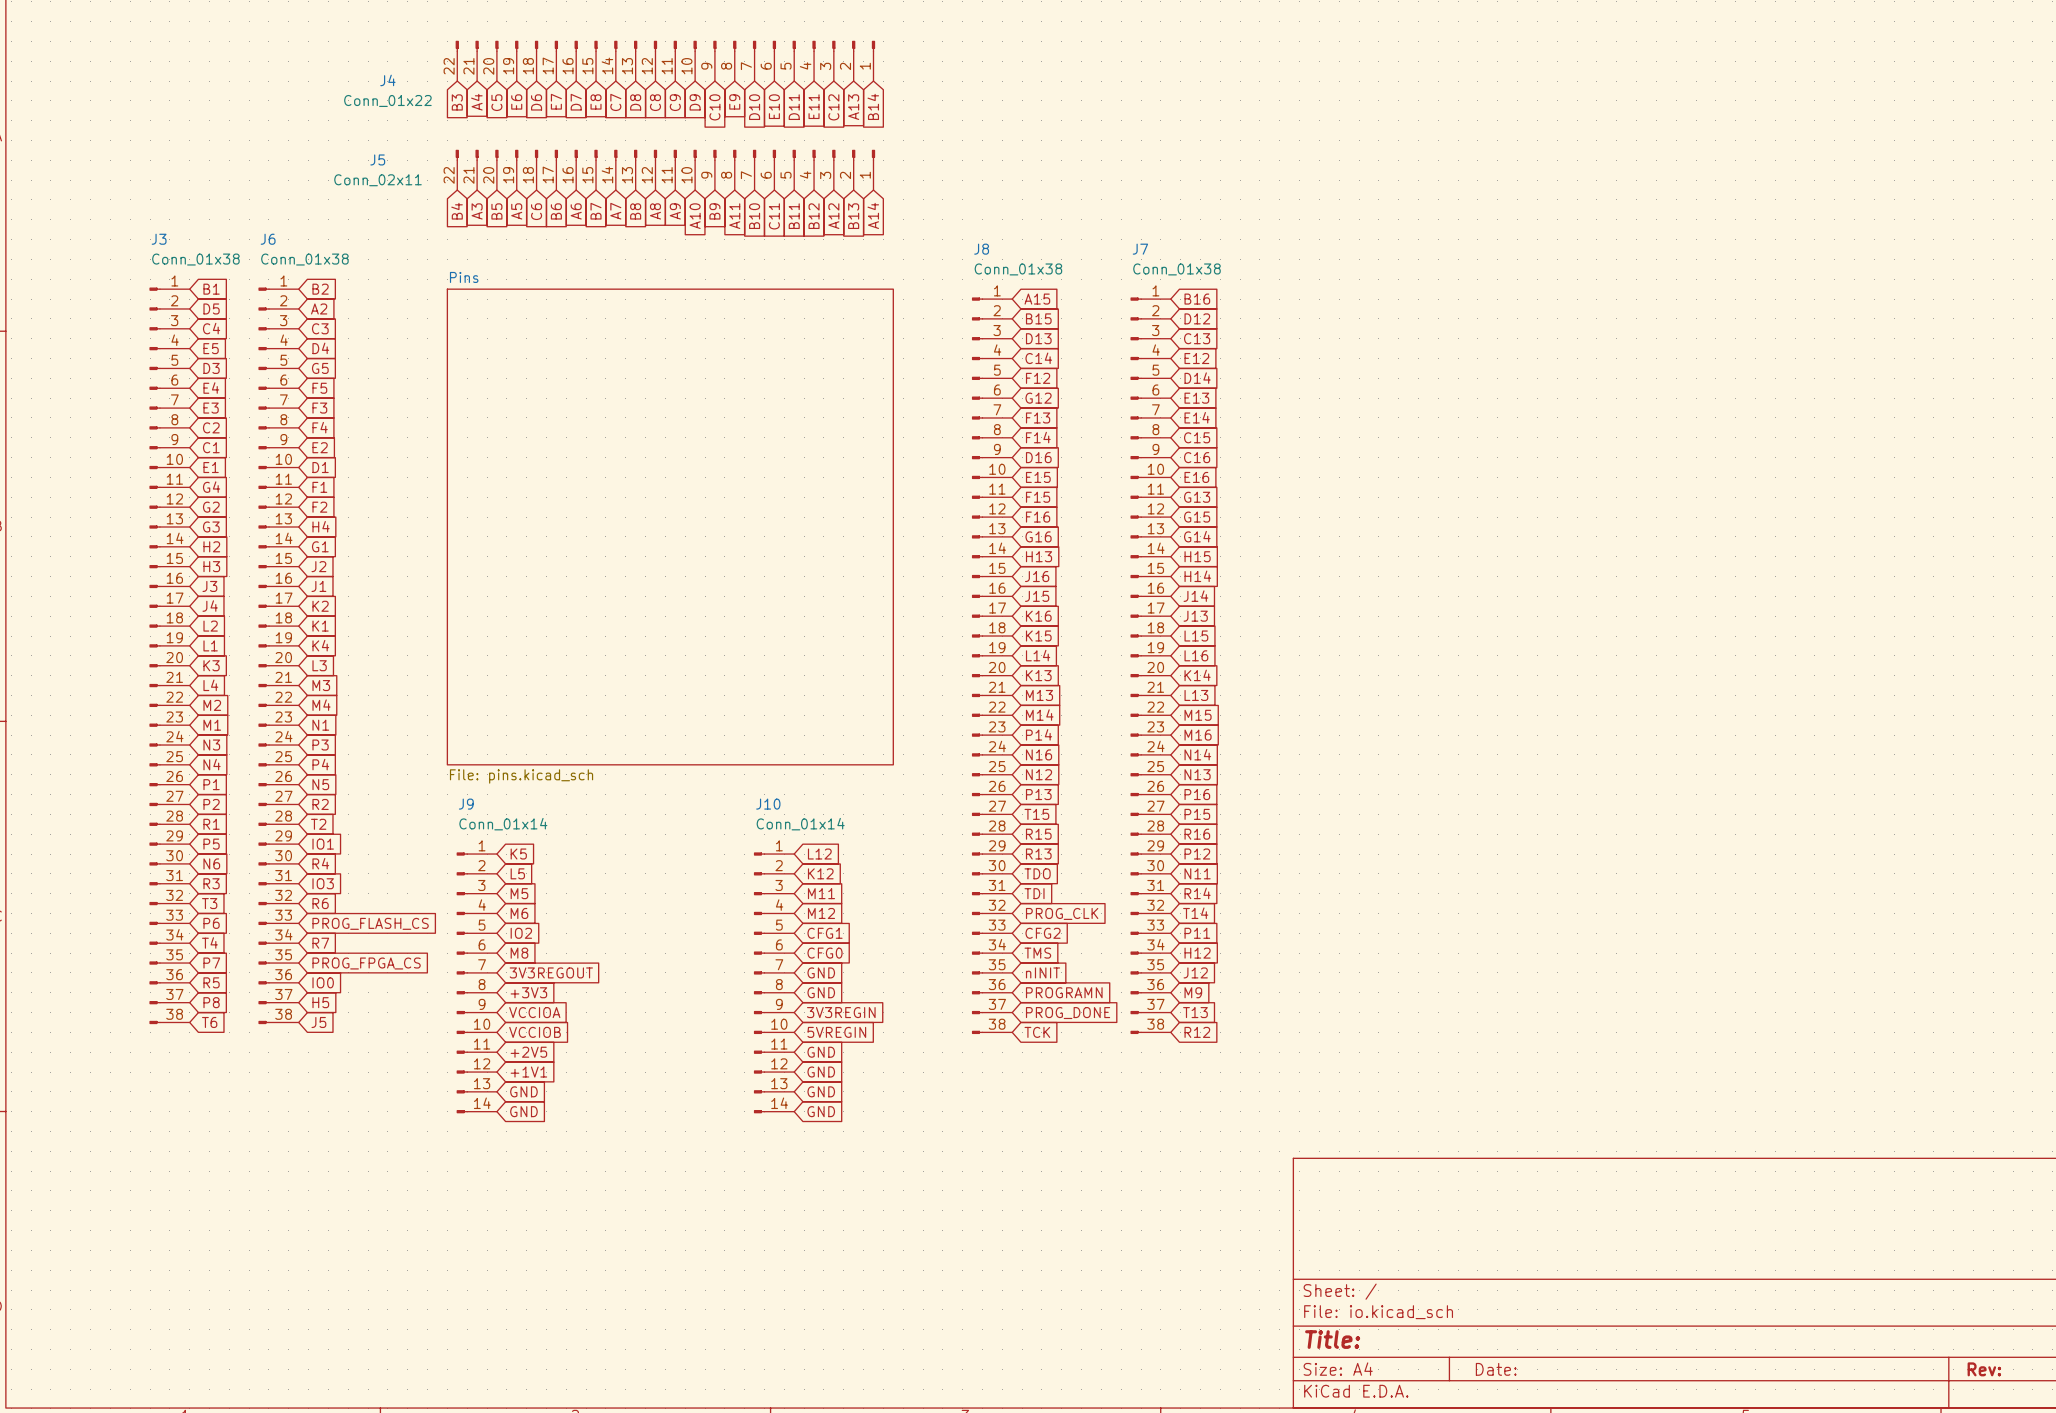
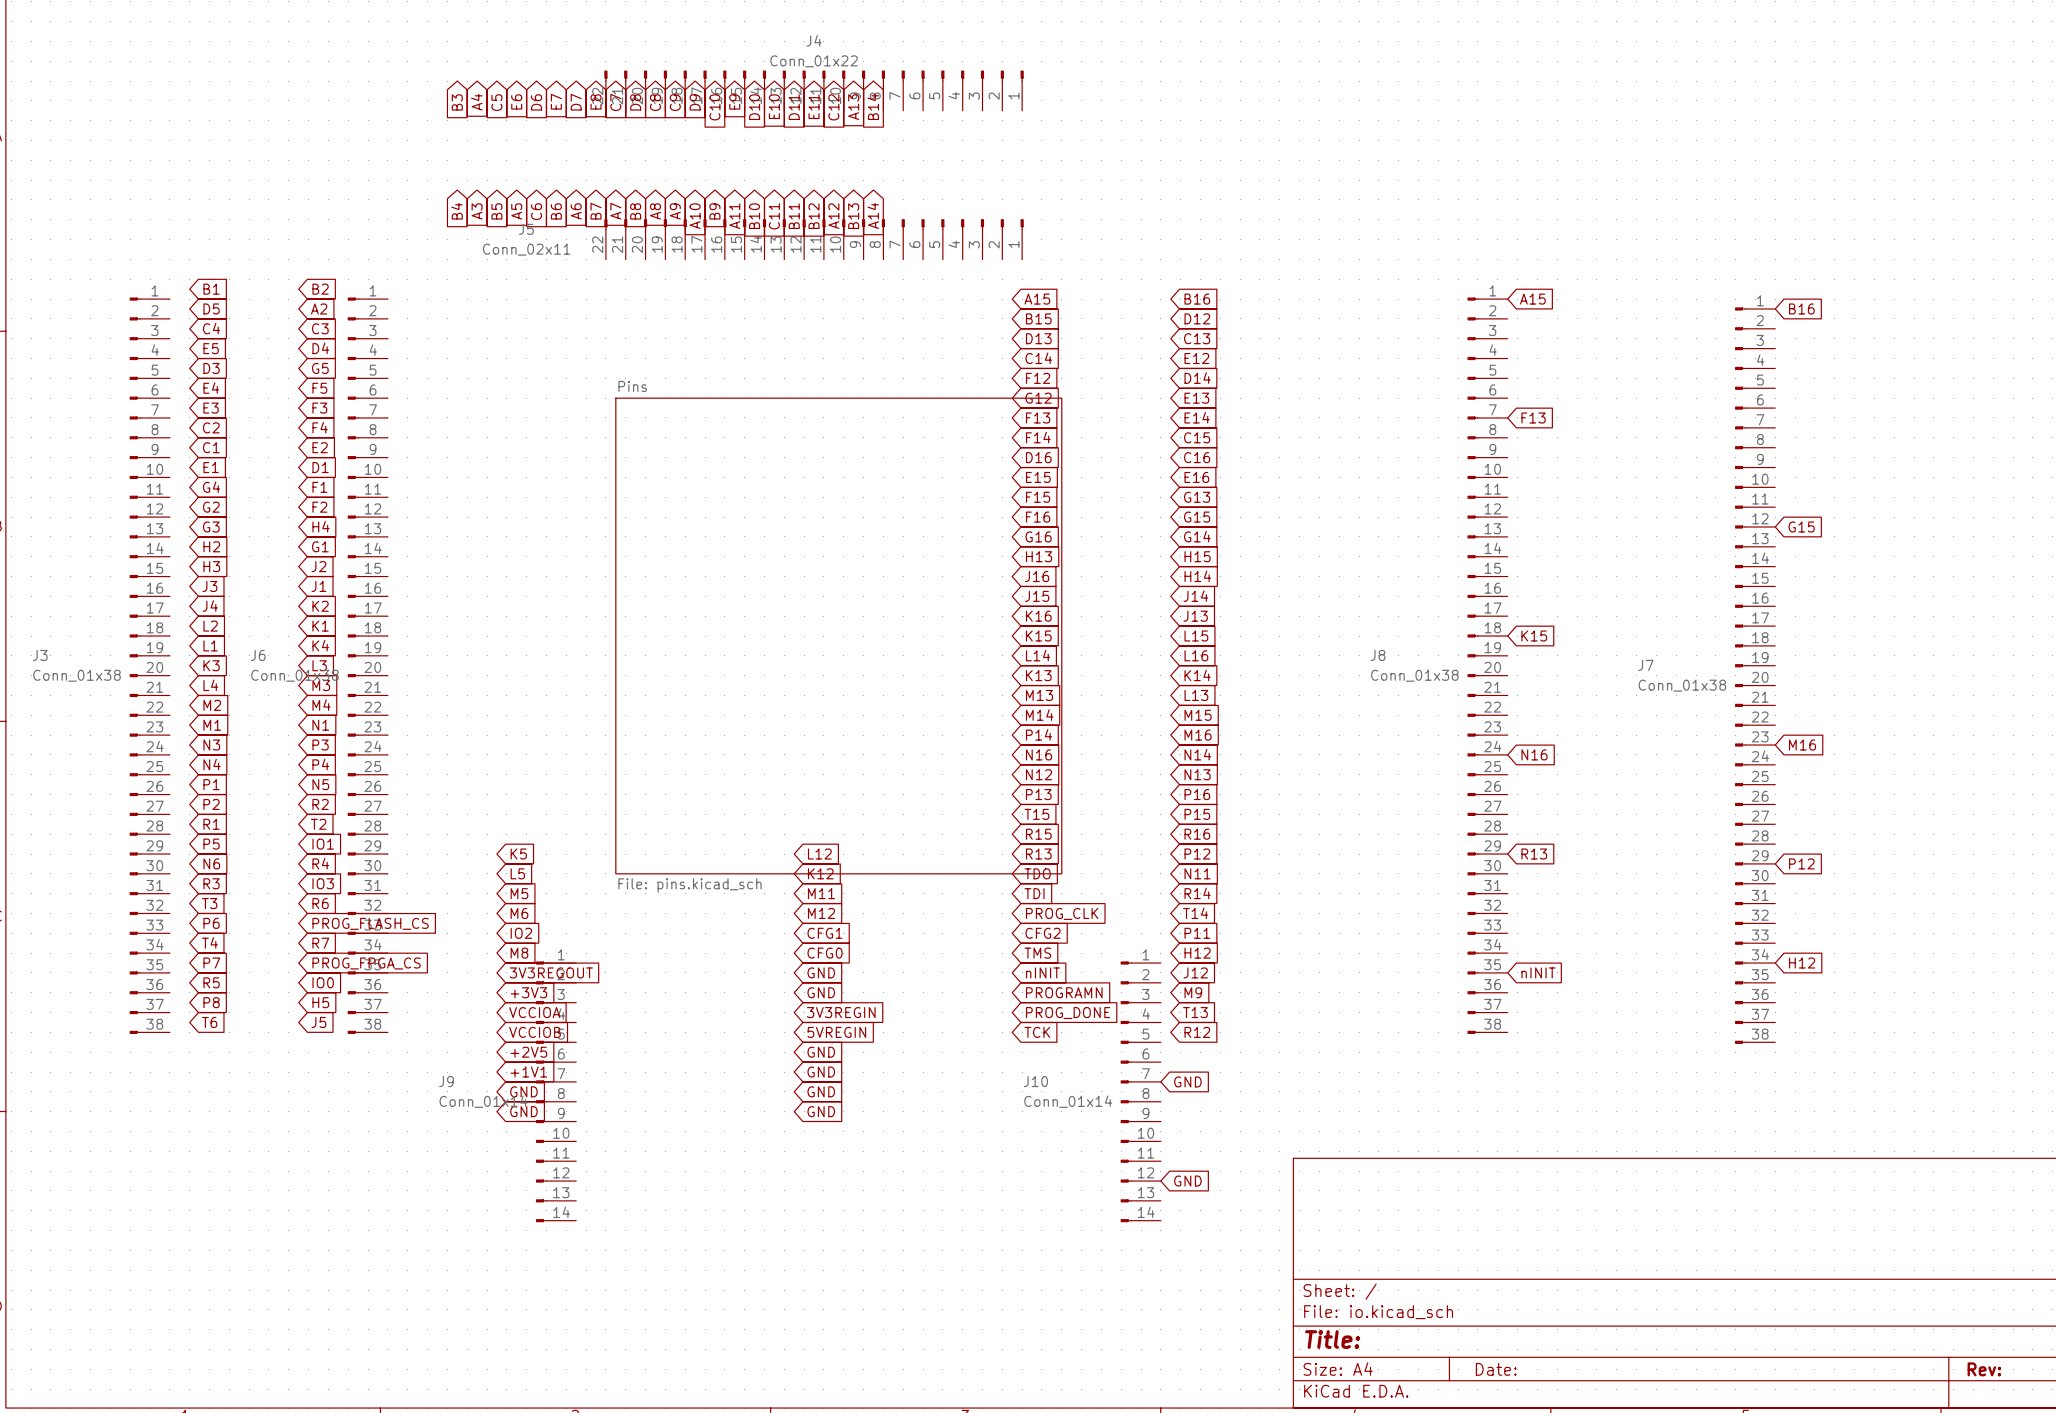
J4 position: (665, 60) -> (814, 90)
J4 name position: J4 (387, 80) -> J4 (814, 40)
J4 value position: Conn_01x22 (387, 100) -> Conn_01x22 (814, 61)
J5 position: (665, 169) -> (814, 239)
J3 name position: J3 (159, 239) -> J3 (40, 655)
J6 name position: J6 (268, 239) -> J6 (258, 655)
J8 name position: J8 (981, 249) -> J8 (1378, 655)
J7 name position: J7 (1140, 249) -> J7 (1645, 665)
J3 value position: Conn_01x38 (195, 259) -> Conn_01x38 (77, 675)
J6 value position: Conn_01x38 (304, 259) -> Conn_01x38 (295, 675)
J8 value position: Conn_01x38 (1018, 269) -> Conn_01x38 (1414, 675)
J7 value position: Conn_01x38 (1176, 269) -> Conn_01x38 (1682, 685)
global label: none -> A15 (1532, 299)
global label: none -> B16 (1801, 308)
global label: none -> F13 (1533, 417)
sheet Pins: File: pins.kicad_sch (670, 526) -> none
global label: none -> G15 (1801, 526)
sheet Pins: none -> File: pins.kicad_sch (838, 636)
global label: none -> K15 (1534, 636)
J3 position: (169, 655) -> (149, 665)
J6 position: (278, 655) -> (367, 665)
J8 position: (992, 665) -> (1487, 665)
J7 position: (1150, 665) -> (1755, 675)
global label: none -> M16 (1802, 745)
global label: none -> N16 (1534, 754)
J9 name position: J9 (466, 804) -> J9 (446, 1081)
J10 name position: J10 (768, 804) -> J10 (1035, 1081)
J9 value position: Conn_01x14 (503, 824) -> Conn_01x14 (483, 1101)
J10 value position: Conn_01x14 (800, 824) -> Conn_01x14 (1068, 1101)
global label: none -> R13 (1534, 854)
global label: none -> P12 (1801, 863)
global label: none -> H12 (1802, 963)
global label: none -> nINIT (1538, 972)
J9 position: (476, 982) -> (556, 1091)
J10 position: (774, 982) -> (1140, 1091)
global label: none -> GND (1187, 1081)
global label: none -> GND (1187, 1181)

